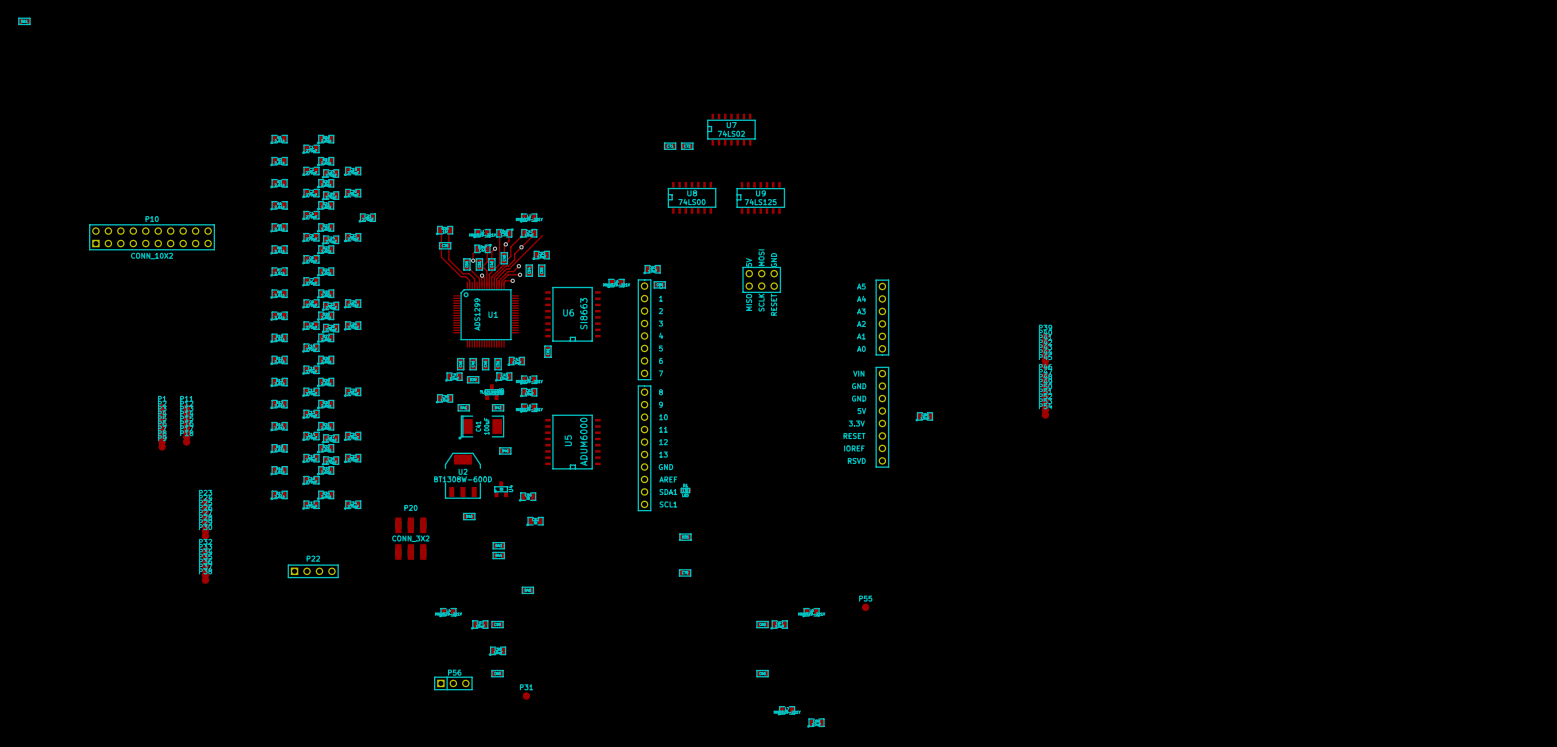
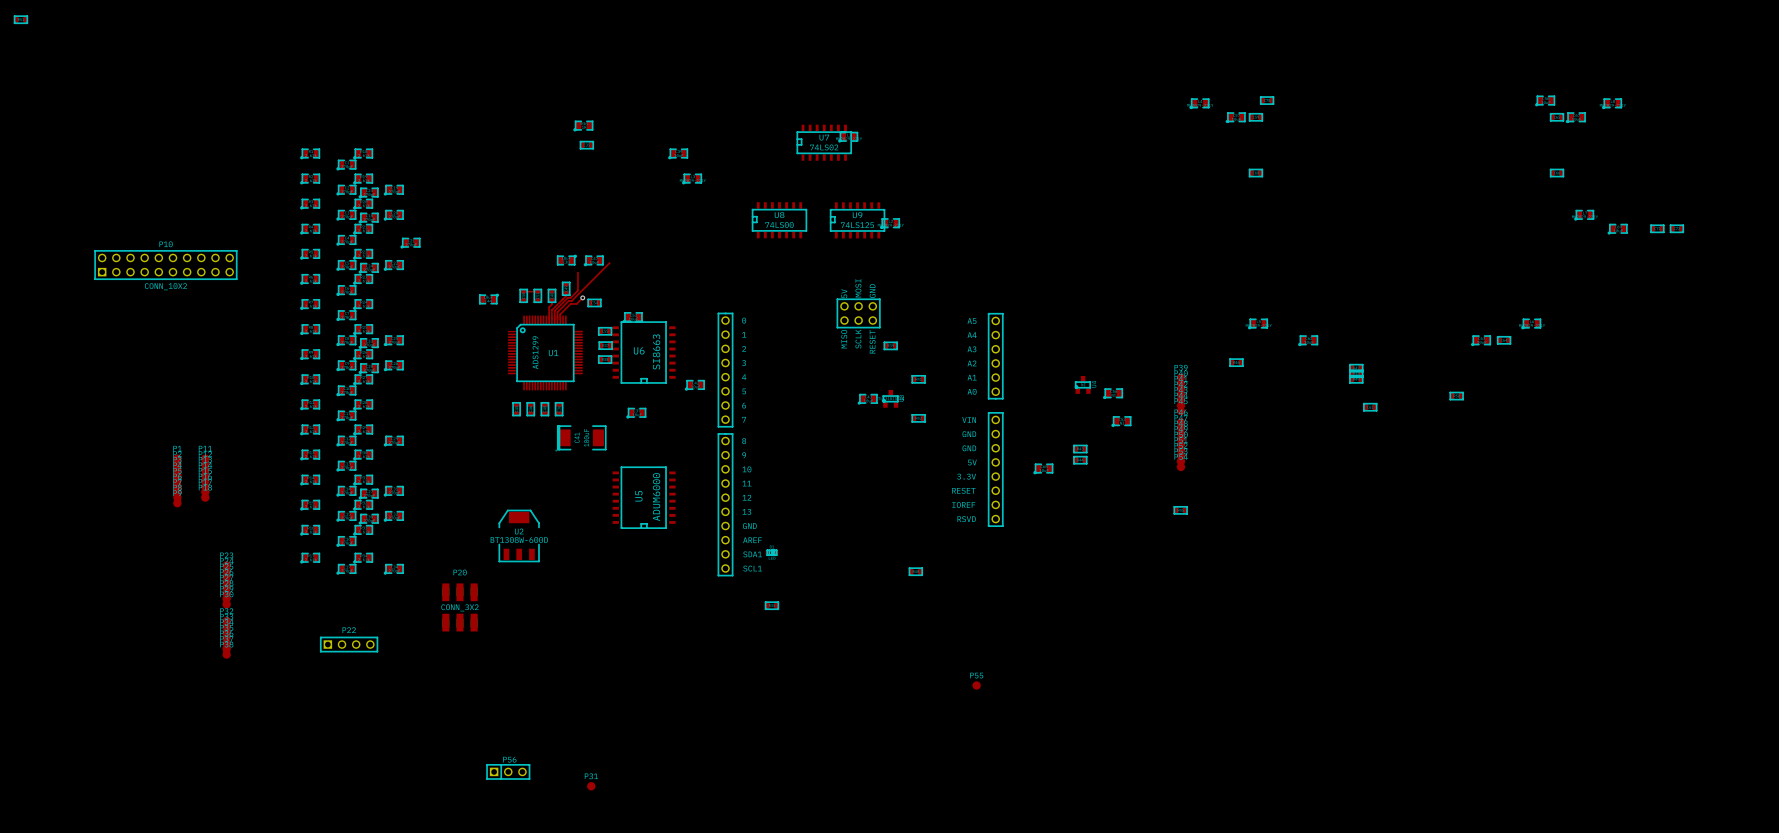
part position: (670, 146) -> (1657, 228)
part position: (687, 146) -> (1676, 228)
part position: (528, 218) -> (890, 223)
top track: (440, 230) (441, 257) (460, 276) (465, 276) (469, 280) (469, 285) -> none
part position: (444, 230) -> (583, 126)
top track: (449, 230) (448, 259) (462, 273) (469, 273) (474, 279) (474, 285) -> none
part position: (481, 233) -> (848, 137)
top track: (499, 233) (499, 264) (495, 268) (491, 268) -> none
top track: (508, 233) (508, 241) (504, 245) (504, 254) -> none
top track: (524, 233) (510, 247) (510, 256) (504, 261) -> none
top track: (533, 233) (514, 254) -> (577, 272) (577, 284)
via: (505, 244) -> none
part position: (445, 245) -> (586, 145)
via: (521, 247) -> none
top track: (477, 248) (473, 253) (473, 260) -> none
part position: (483, 248) -> (489, 299)
top track: (487, 248) (487, 261) (480, 268) -> none
top track: (494, 248) (491, 251) (491, 260) -> none
via: (494, 248) -> none
part position: (541, 255) -> (632, 317)
via: (473, 260) -> none
top track: (466, 268) (479, 278) (479, 285) -> none
top track: (479, 268) (484, 268) (486, 270) (486, 285) -> none
part position: (652, 269) -> (1481, 340)
part rotation: 0° (529, 270) -> 90° clockwise (594, 302)
part rotation: 0° (541, 270) -> 90° clockwise (605, 331)
part position: (541, 270) -> (605, 331)
top track: (520, 274) (508, 274) (501, 281) (501, 285) -> none
via: (520, 274) -> none
via: (482, 275) -> none
top track: (512, 280) (505, 280) (504, 285) -> none
via: (512, 280) -> none
part position: (615, 283) -> (1531, 323)
part position: (659, 284) -> (1504, 340)
top track: (481, 285) (482, 275) (484, 277) (484, 285) -> none
part: none -> (605, 345)
part: none -> (605, 359)
part: none -> (1356, 368)
part: none -> (1356, 373)
part: none -> (1356, 379)
part rotation: 0° (547, 351) -> 90° clockwise (1370, 407)
part position: (547, 351) -> (1370, 407)
part: none -> (1456, 396)
part position: (516, 361) -> (694, 385)
part position: (503, 376) -> (867, 399)
part position: (453, 377) -> (636, 413)
part position: (473, 379) -> (890, 345)
part position: (528, 380) -> (692, 178)
part position: (491, 392) -> (890, 398)
part position: (528, 392) -> (1308, 340)
part position: (444, 398) -> (678, 153)
part position: (463, 407) -> (918, 379)
part position: (498, 407) -> (918, 418)
part position: (528, 408) -> (1258, 323)
part position: (482, 426) -> (581, 437)
part position: (505, 450) -> (1236, 362)
part position: (501, 489) -> (1083, 384)
part position: (527, 496) -> (1113, 393)
part position: (469, 516) -> (915, 571)
part position: (534, 521) -> (1121, 421)
part position: (498, 545) -> (1080, 449)
part position: (498, 555) -> (1080, 460)
part position: (685, 572) -> (1267, 100)
part position: (527, 590) -> (1180, 510)
part position: (447, 612) -> (1199, 103)
part position: (810, 612) -> (1612, 103)
part position: (479, 624) -> (1235, 117)
part position: (497, 624) -> (1255, 117)
part position: (762, 624) -> (1557, 117)
part position: (779, 624) -> (1575, 117)
part position: (497, 651) -> (1545, 100)
part position: (497, 673) -> (1255, 173)
part position: (762, 673) -> (1557, 173)
part position: (786, 710) -> (1584, 215)
part position: (815, 723) -> (1617, 229)

